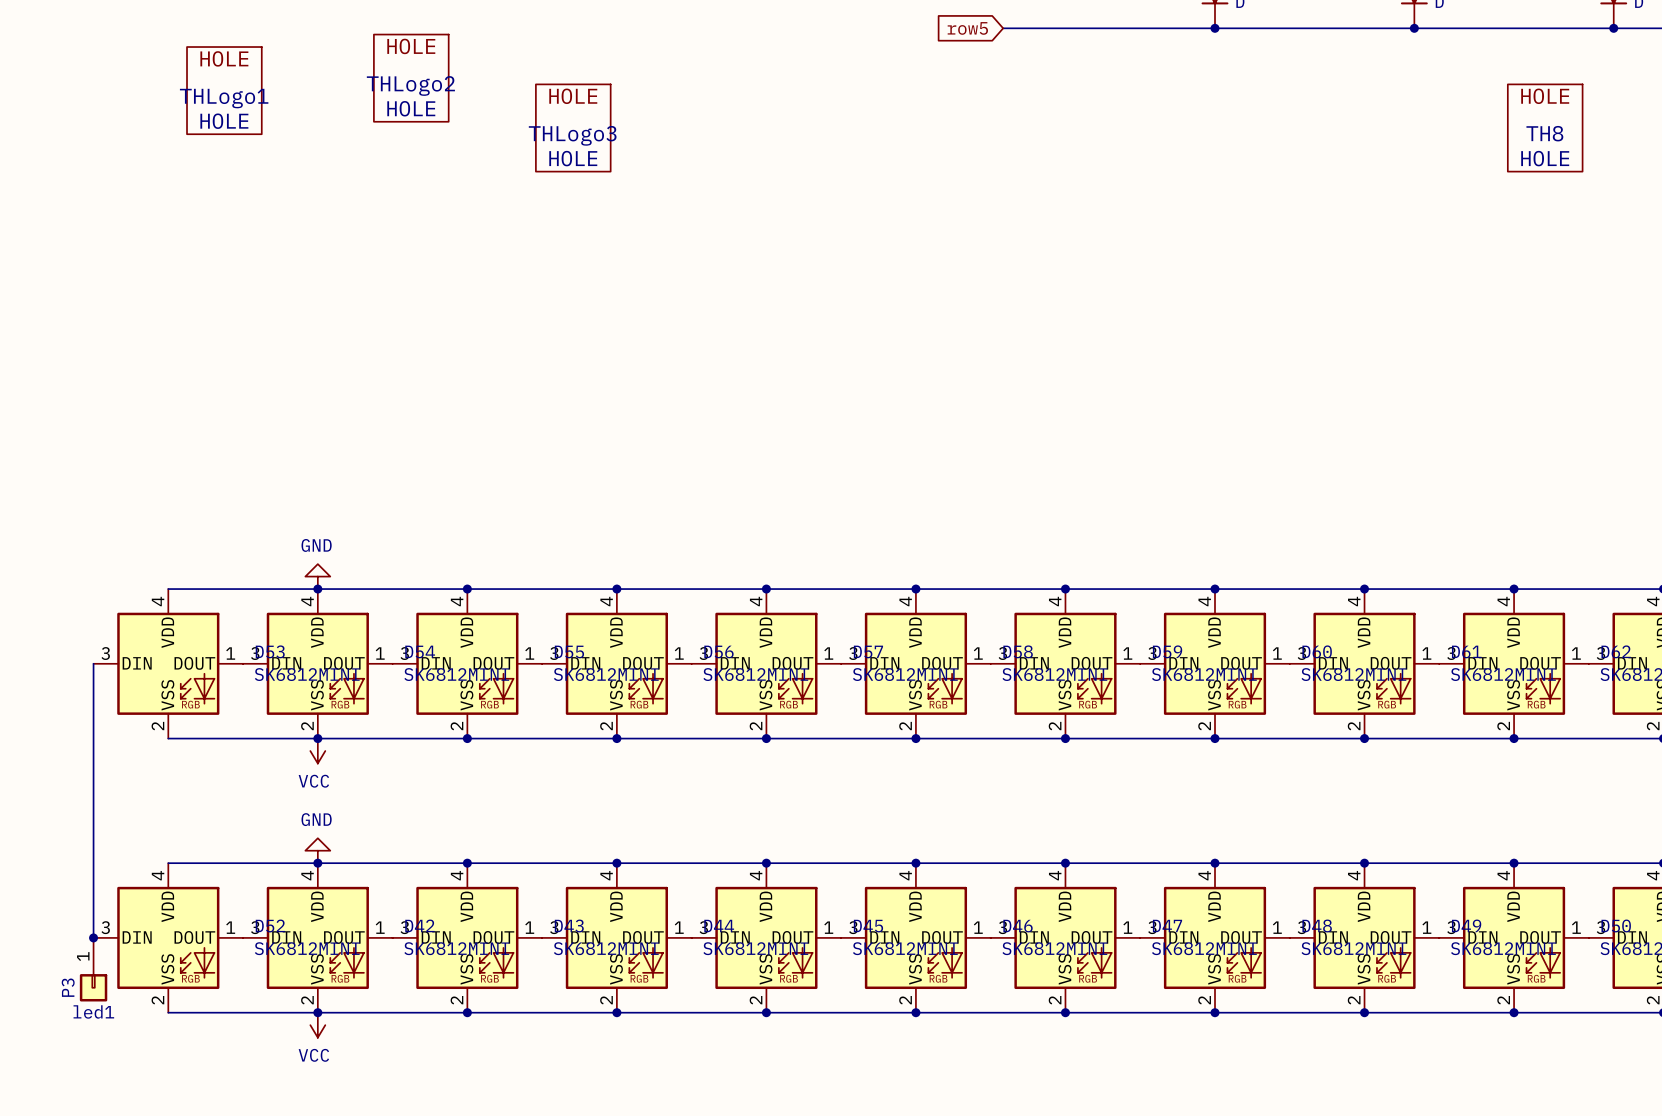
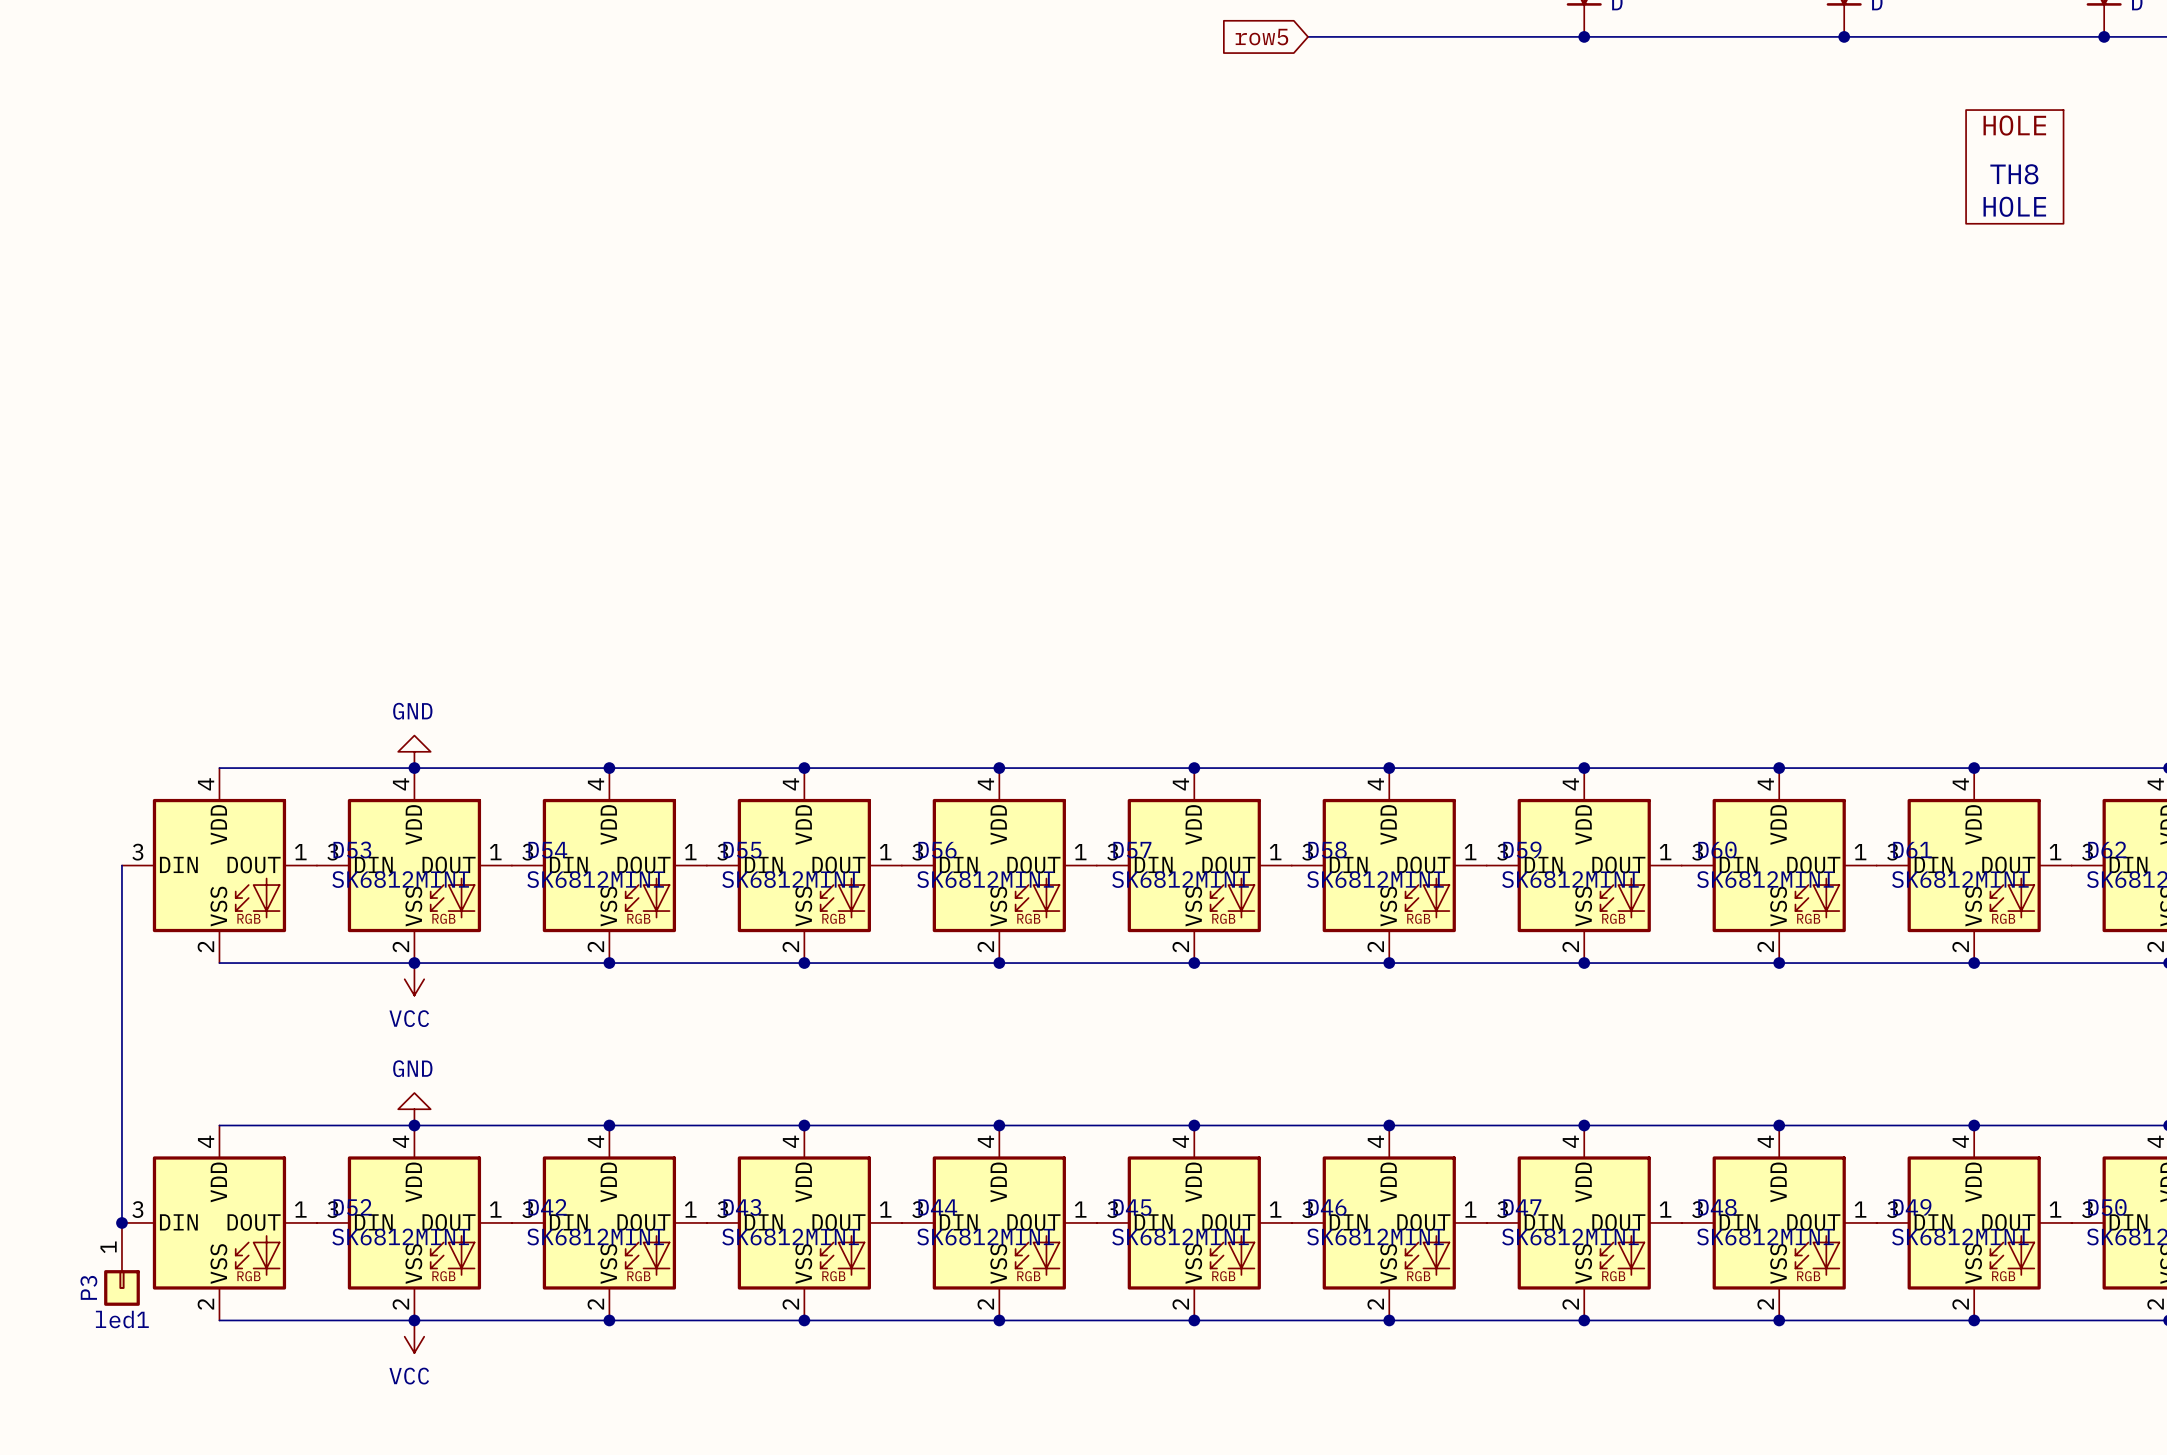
THLogo2: HOLE (411, 78) -> none
THLogo1: HOLE (224, 90) -> none
THLogo3: HOLE (573, 128) -> none

